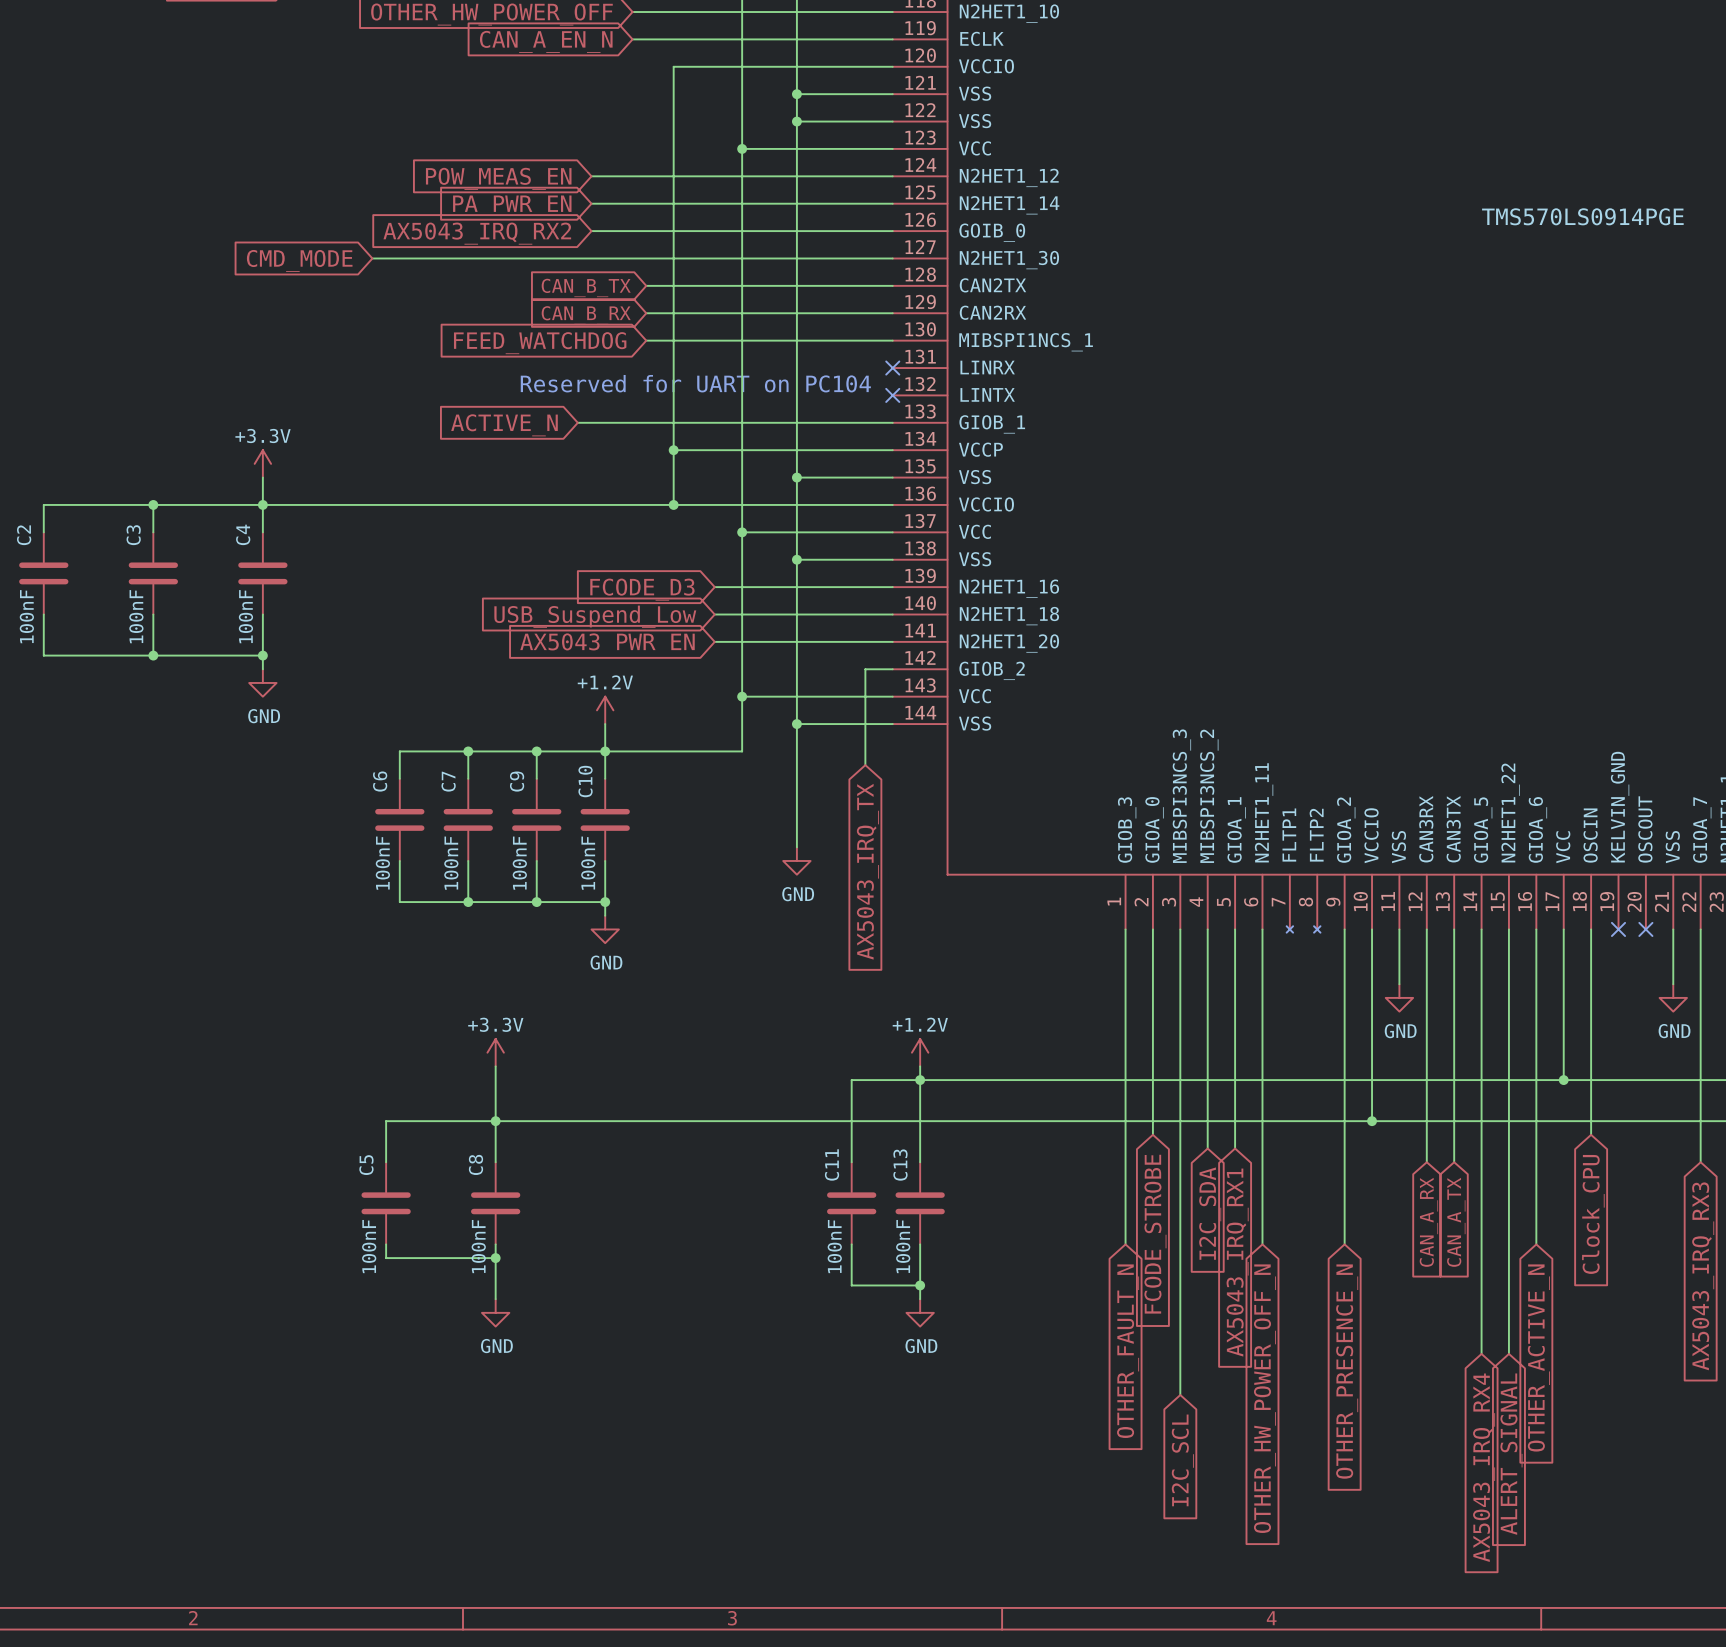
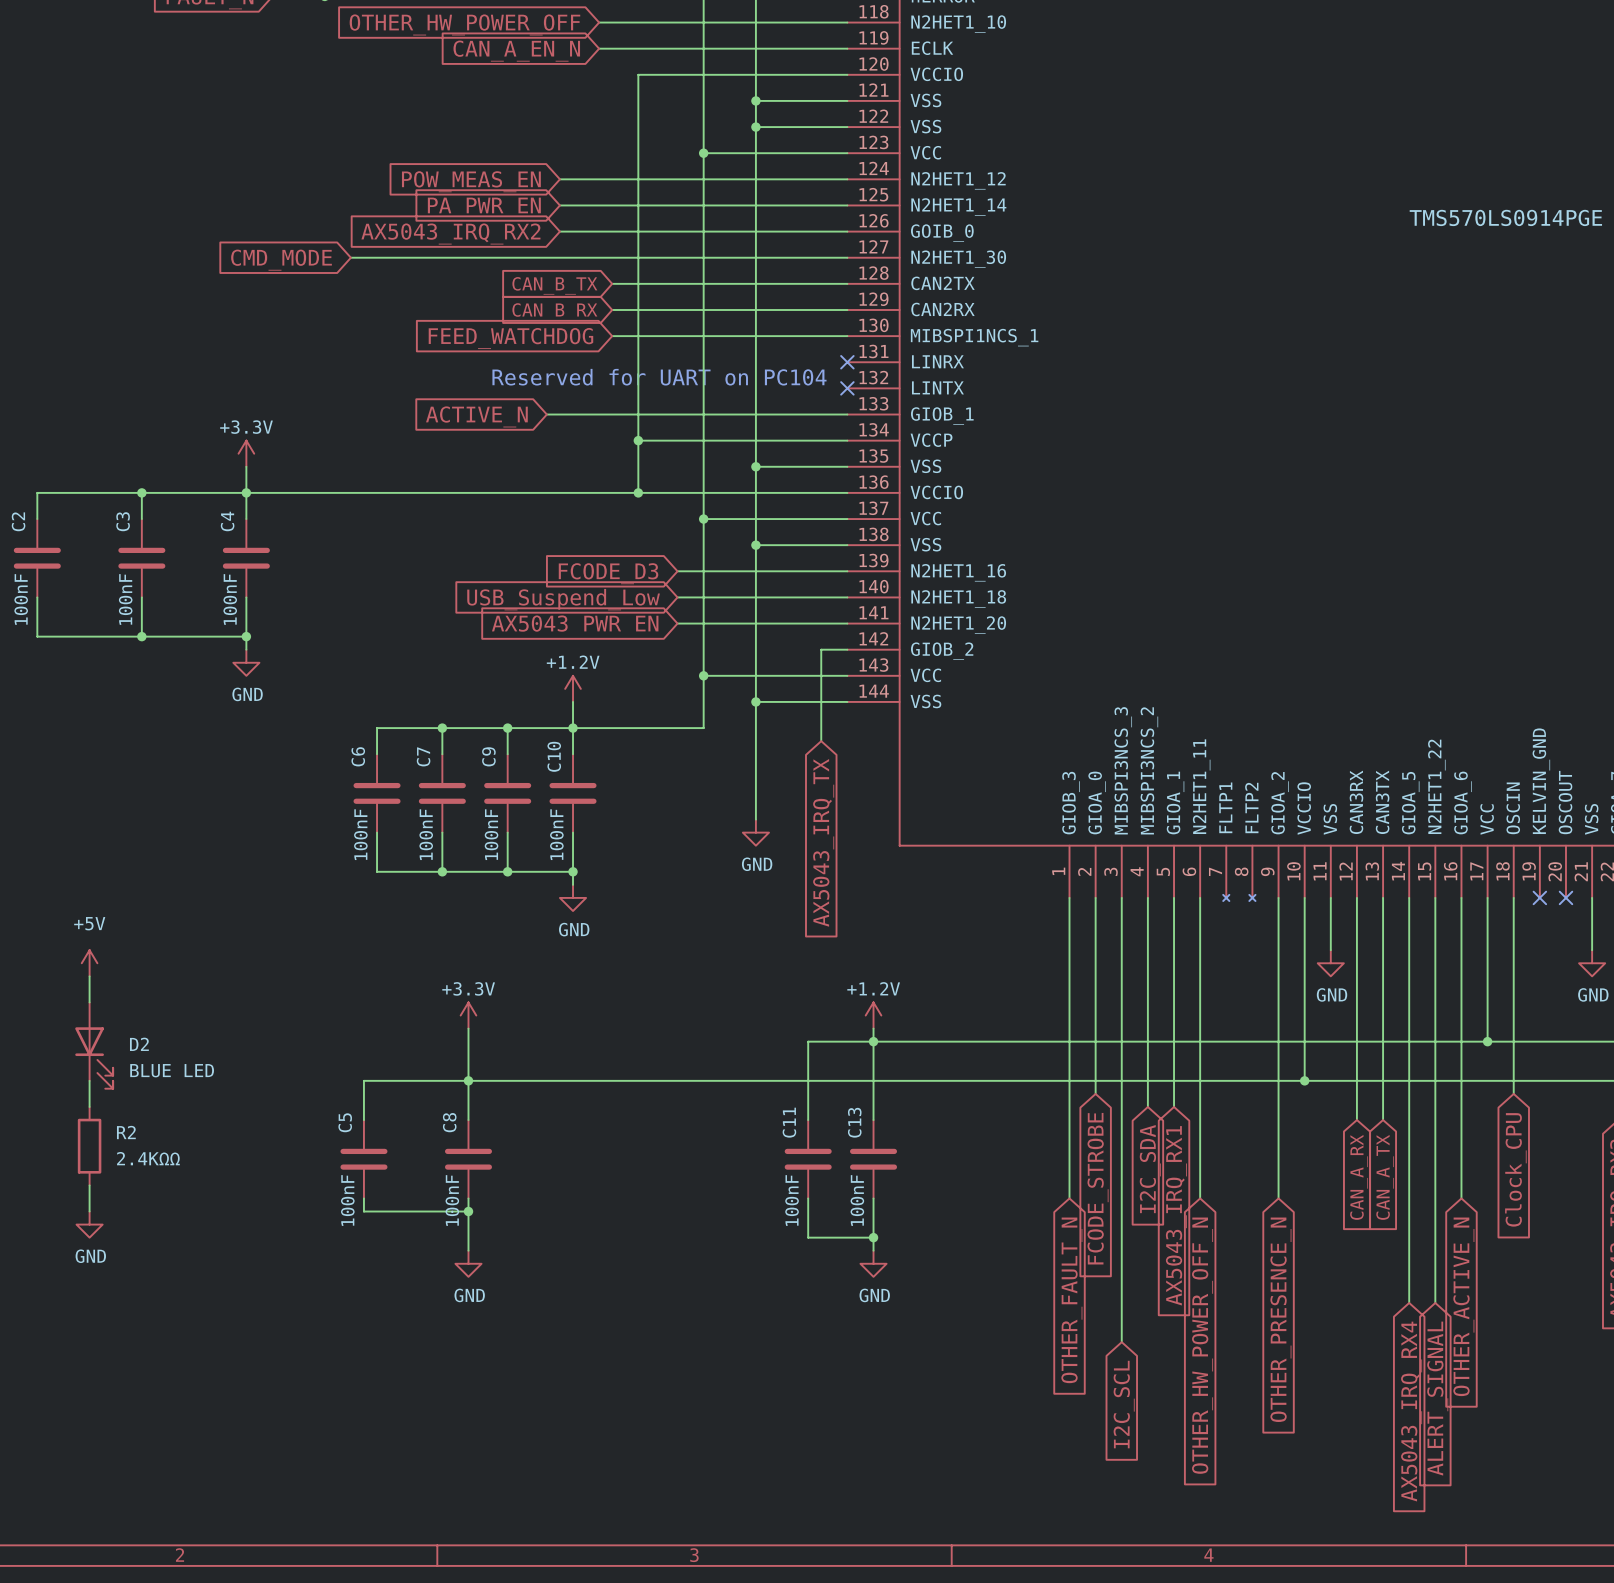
power symbol: none -> +5V (89, 963)
wire: none -> (89, 976) (89, 1002)
D2: none -> BLUE LED (94, 1045)
wire: none -> (89, 1080) (89, 1106)
R2: none -> 2.4KΩΩ (89, 1146)
wire: none -> (89, 1185) (89, 1211)
power symbol: none -> GND (89, 1224)

